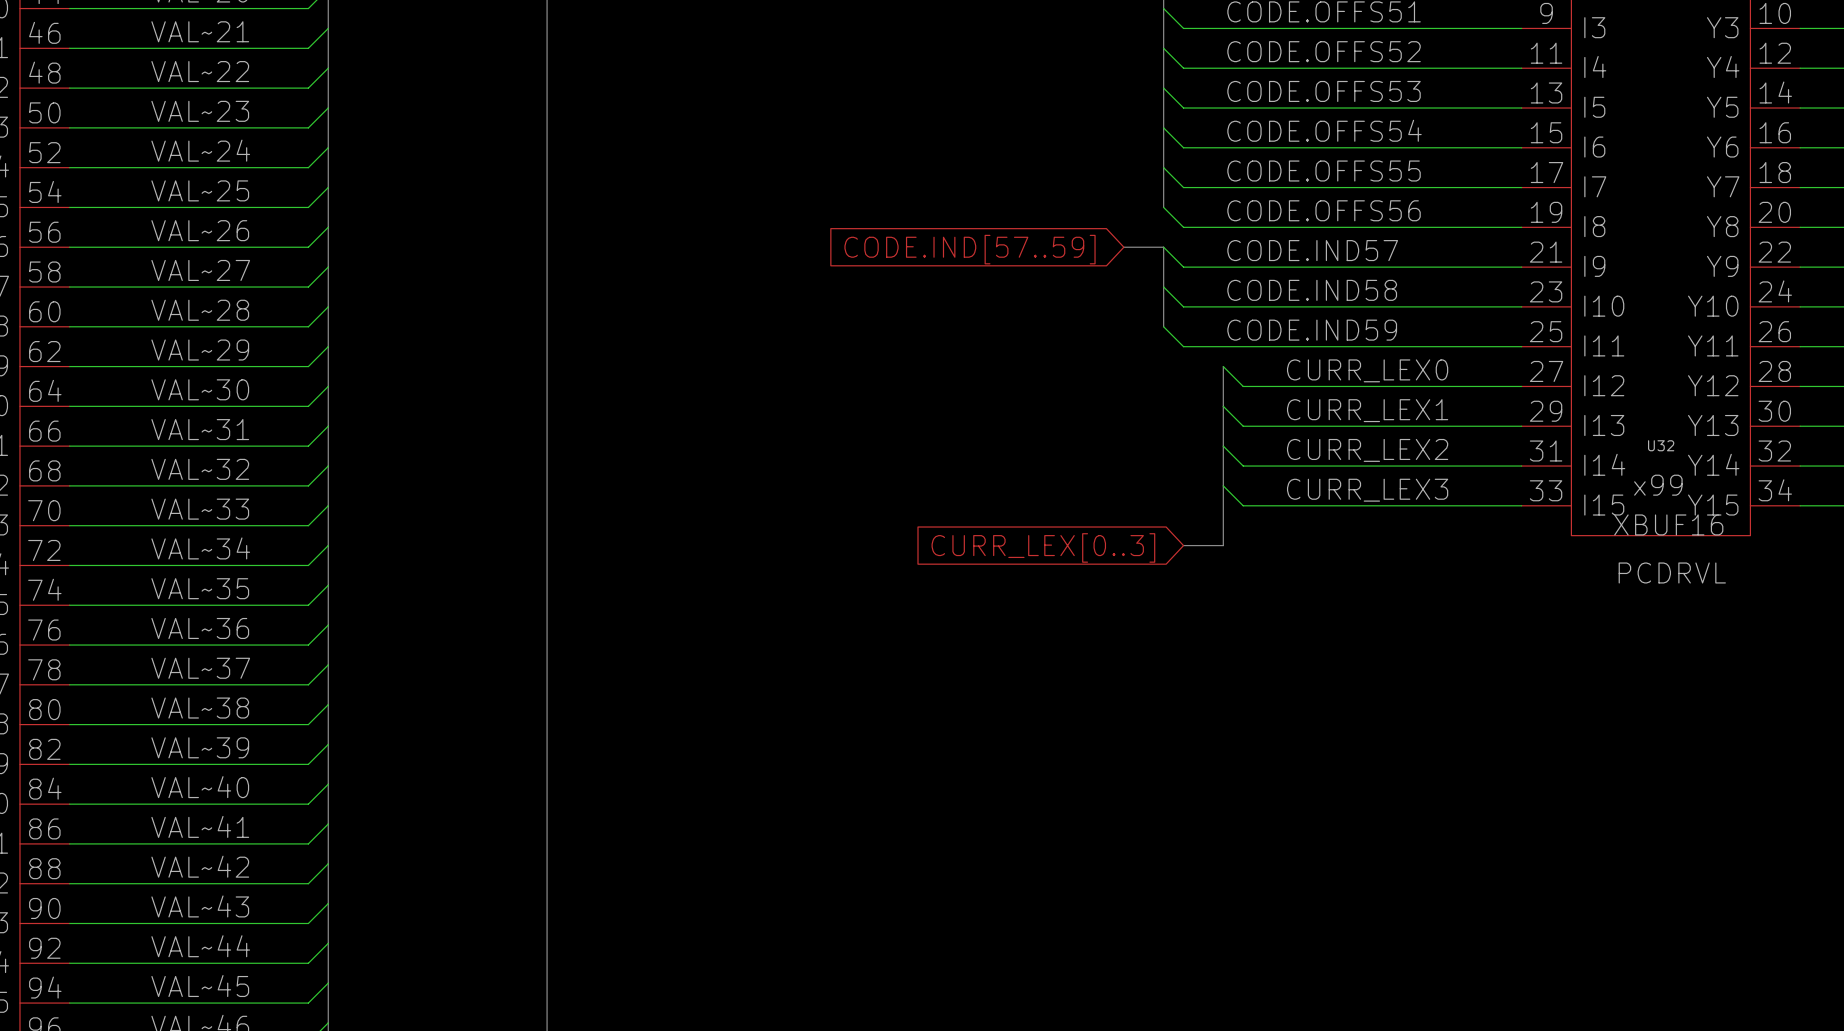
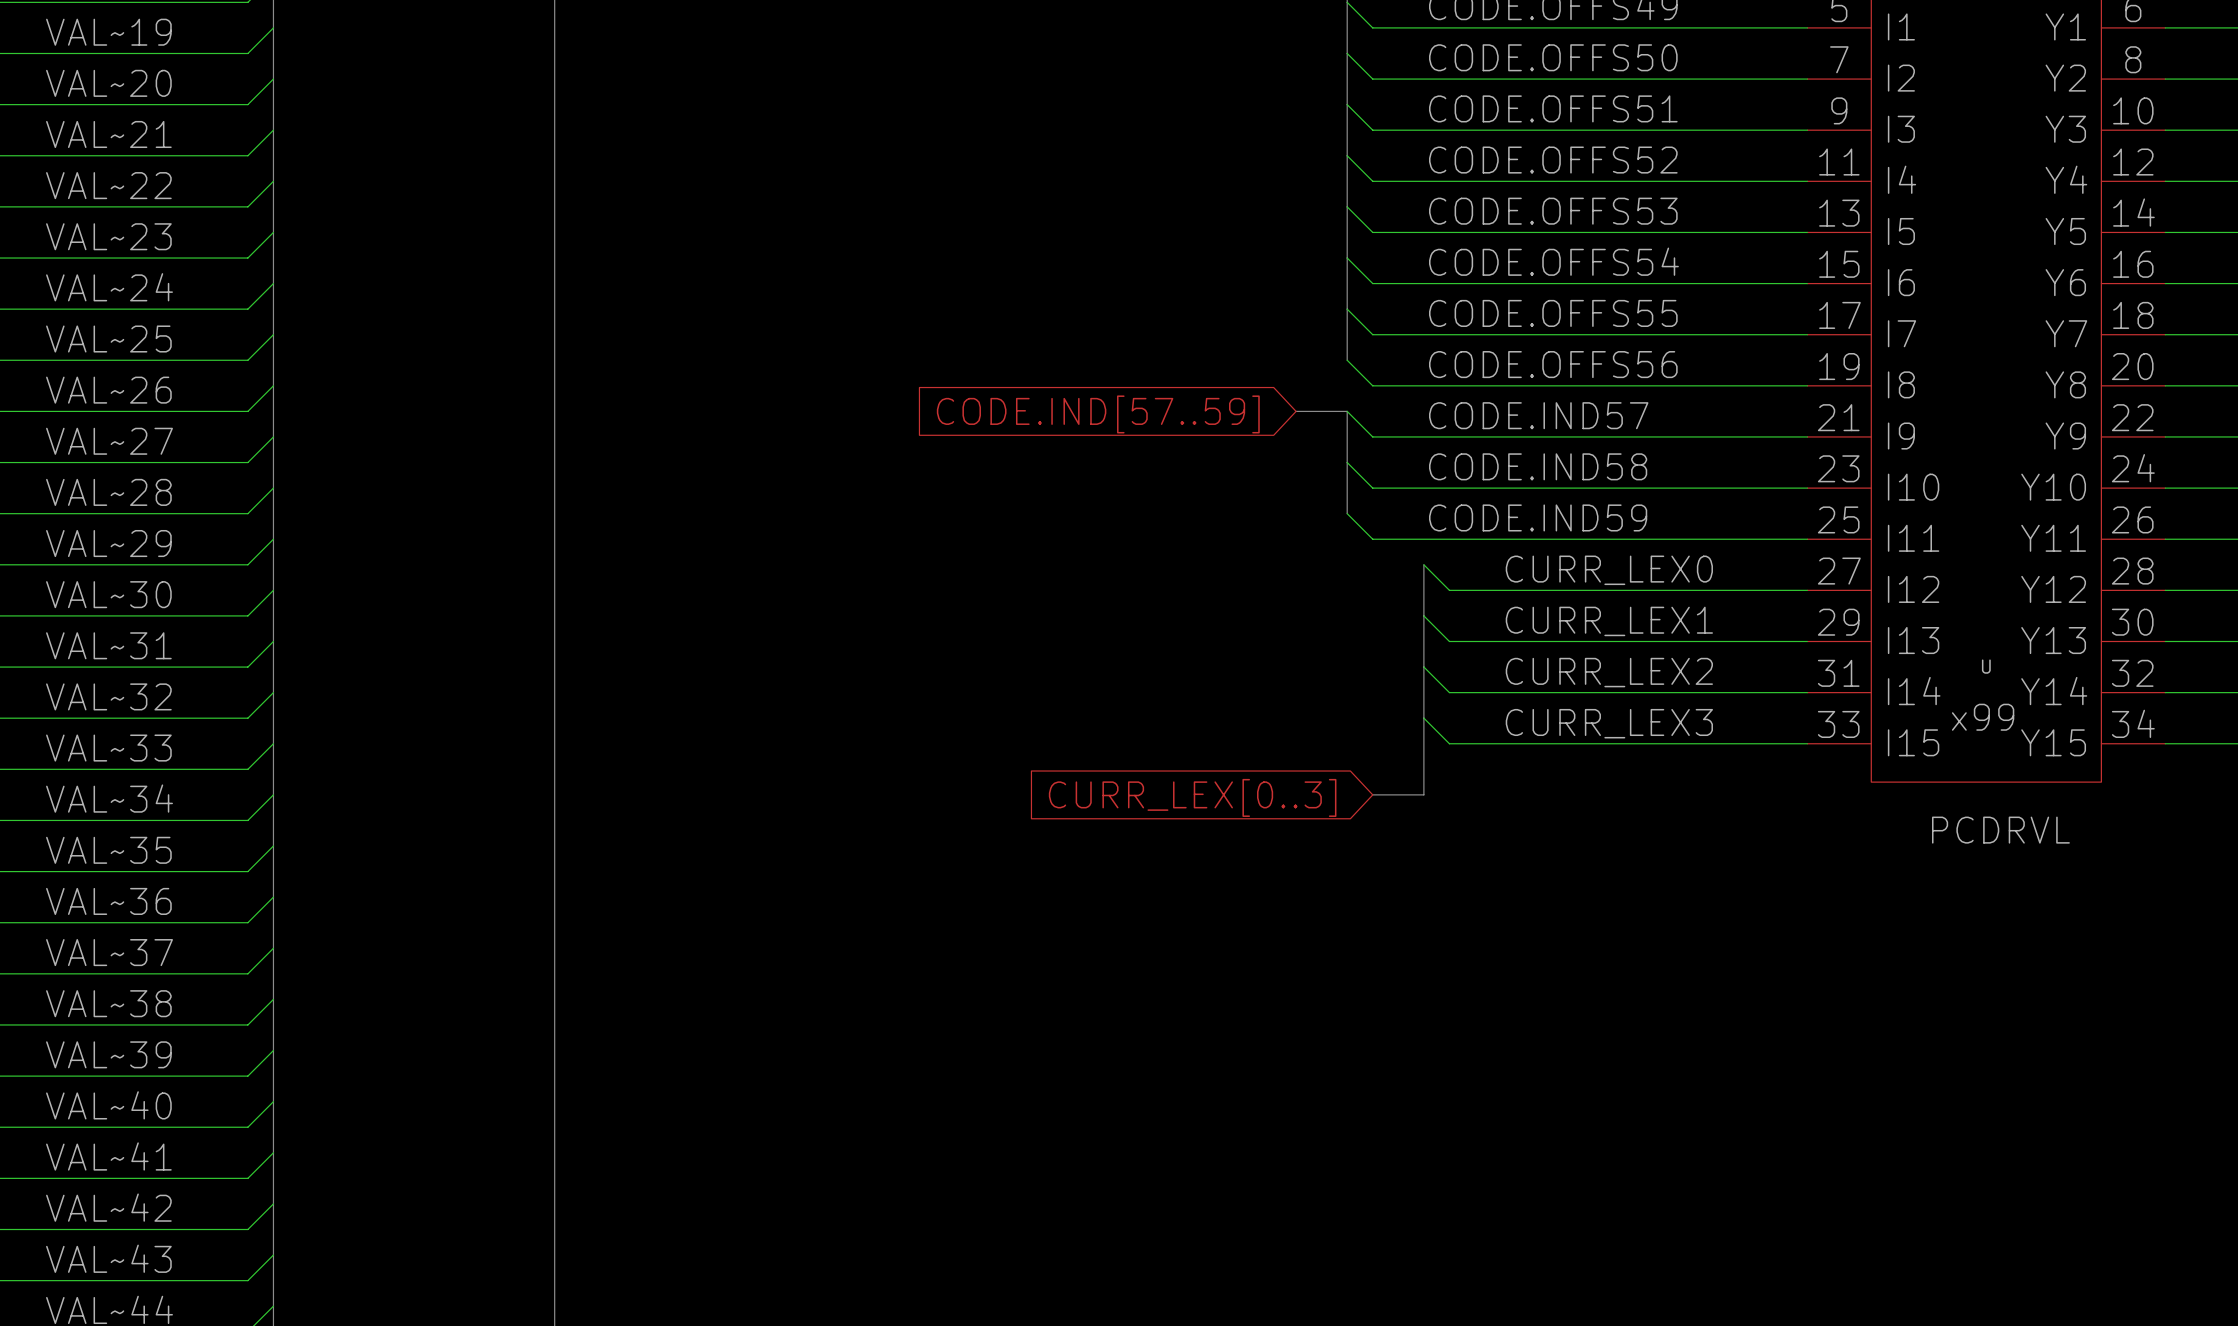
U32 name: U32 (1661, 445) -> U (1986, 666)
U32 value: XBUF16 (1668, 524) -> none

